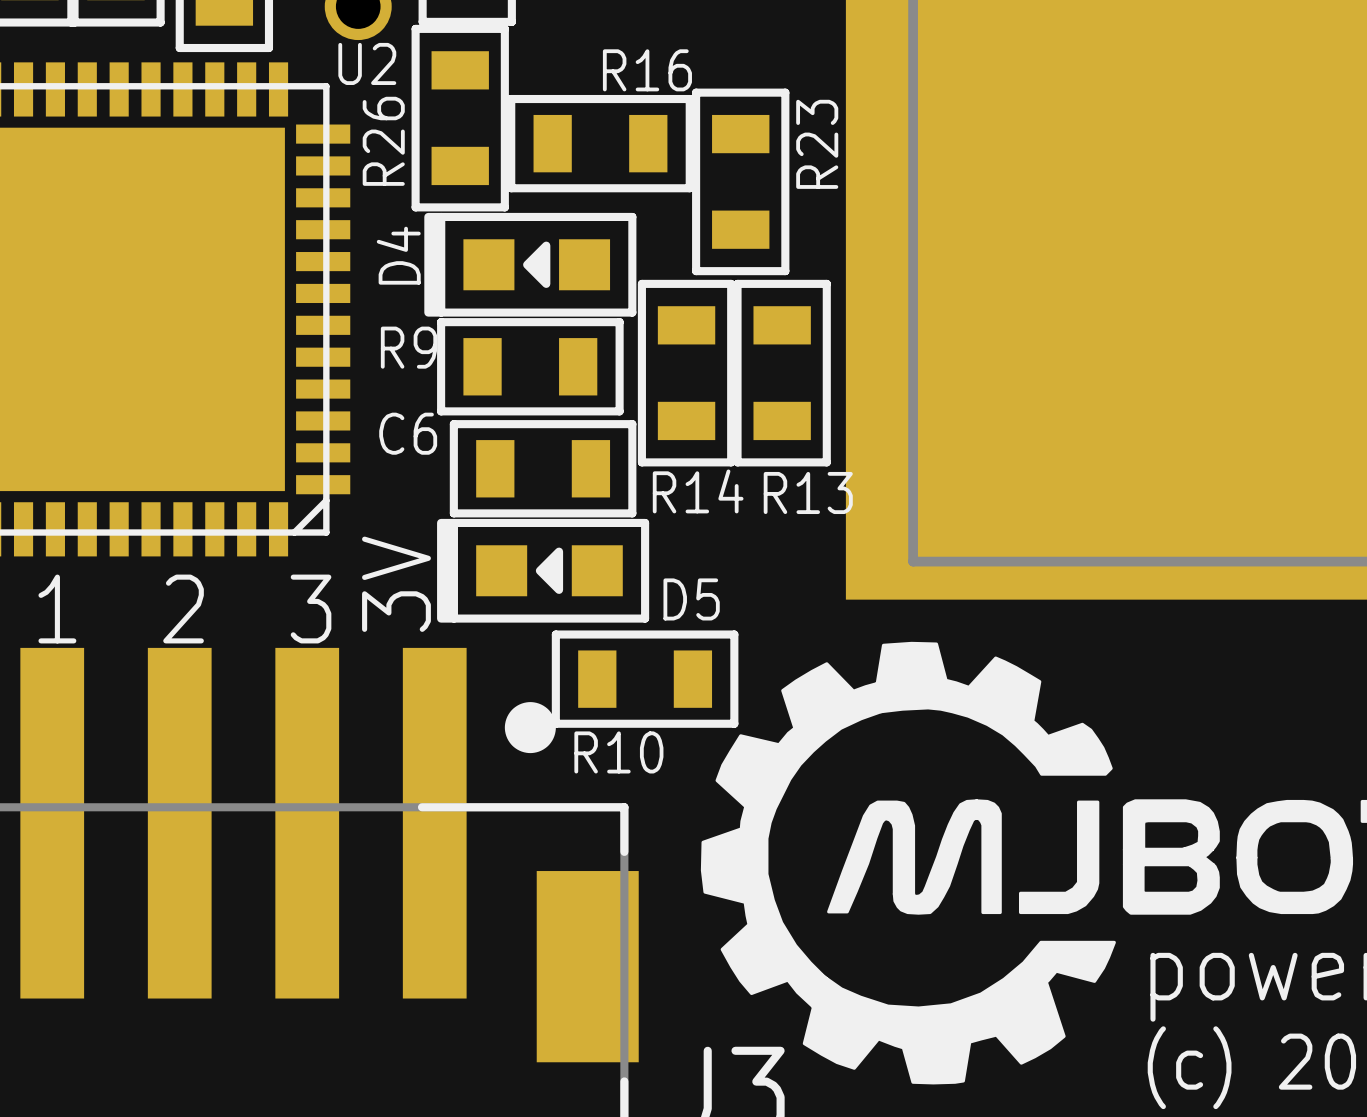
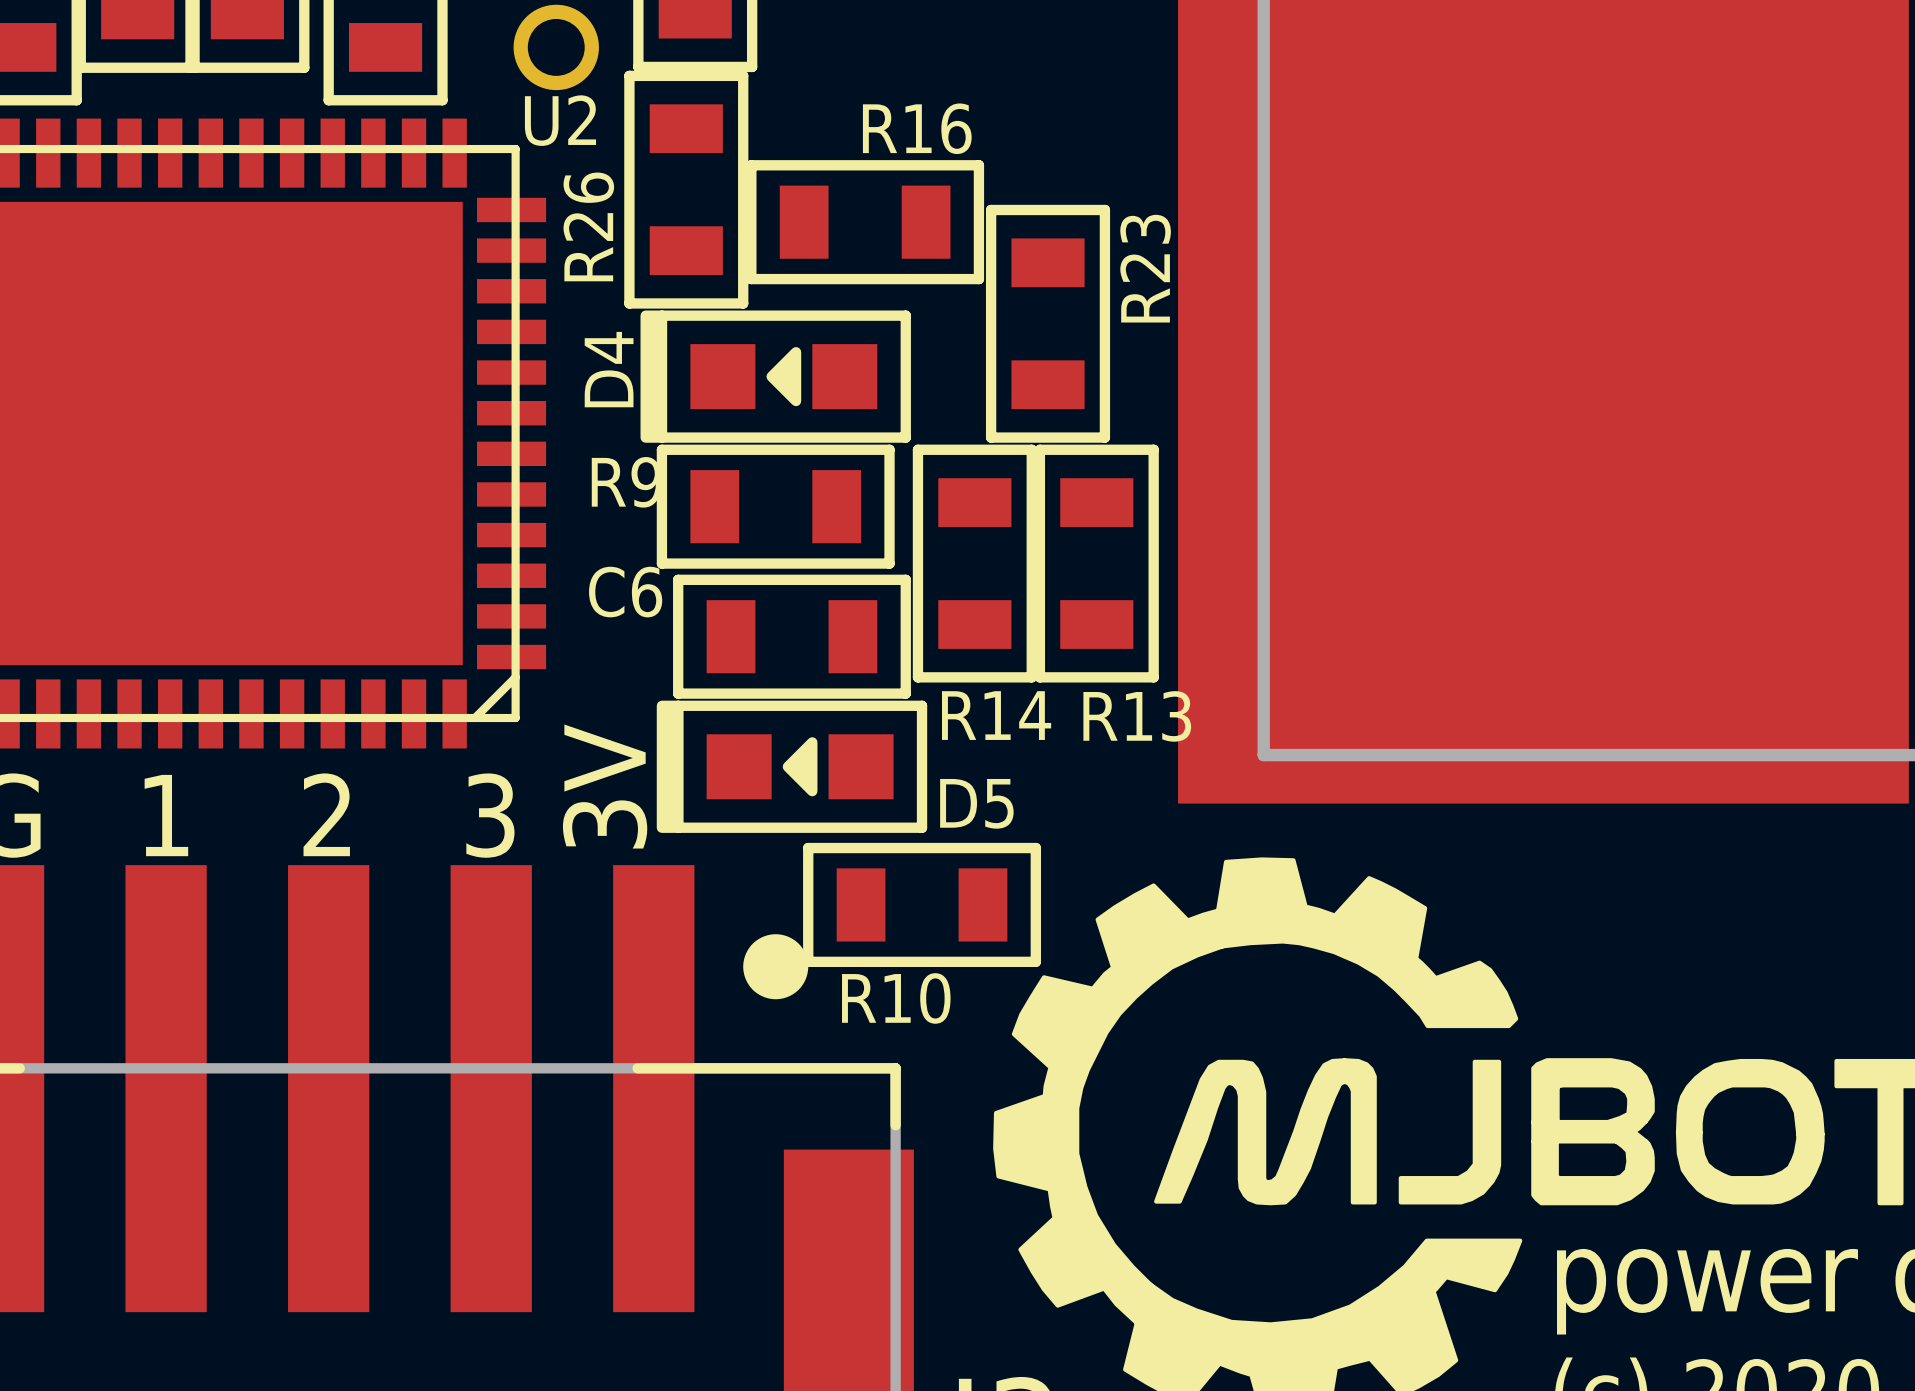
R23 position: (740, 181) -> (1048, 323)
R14 position: (686, 373) -> (974, 563)
R13 position: (782, 373) -> (1096, 563)

